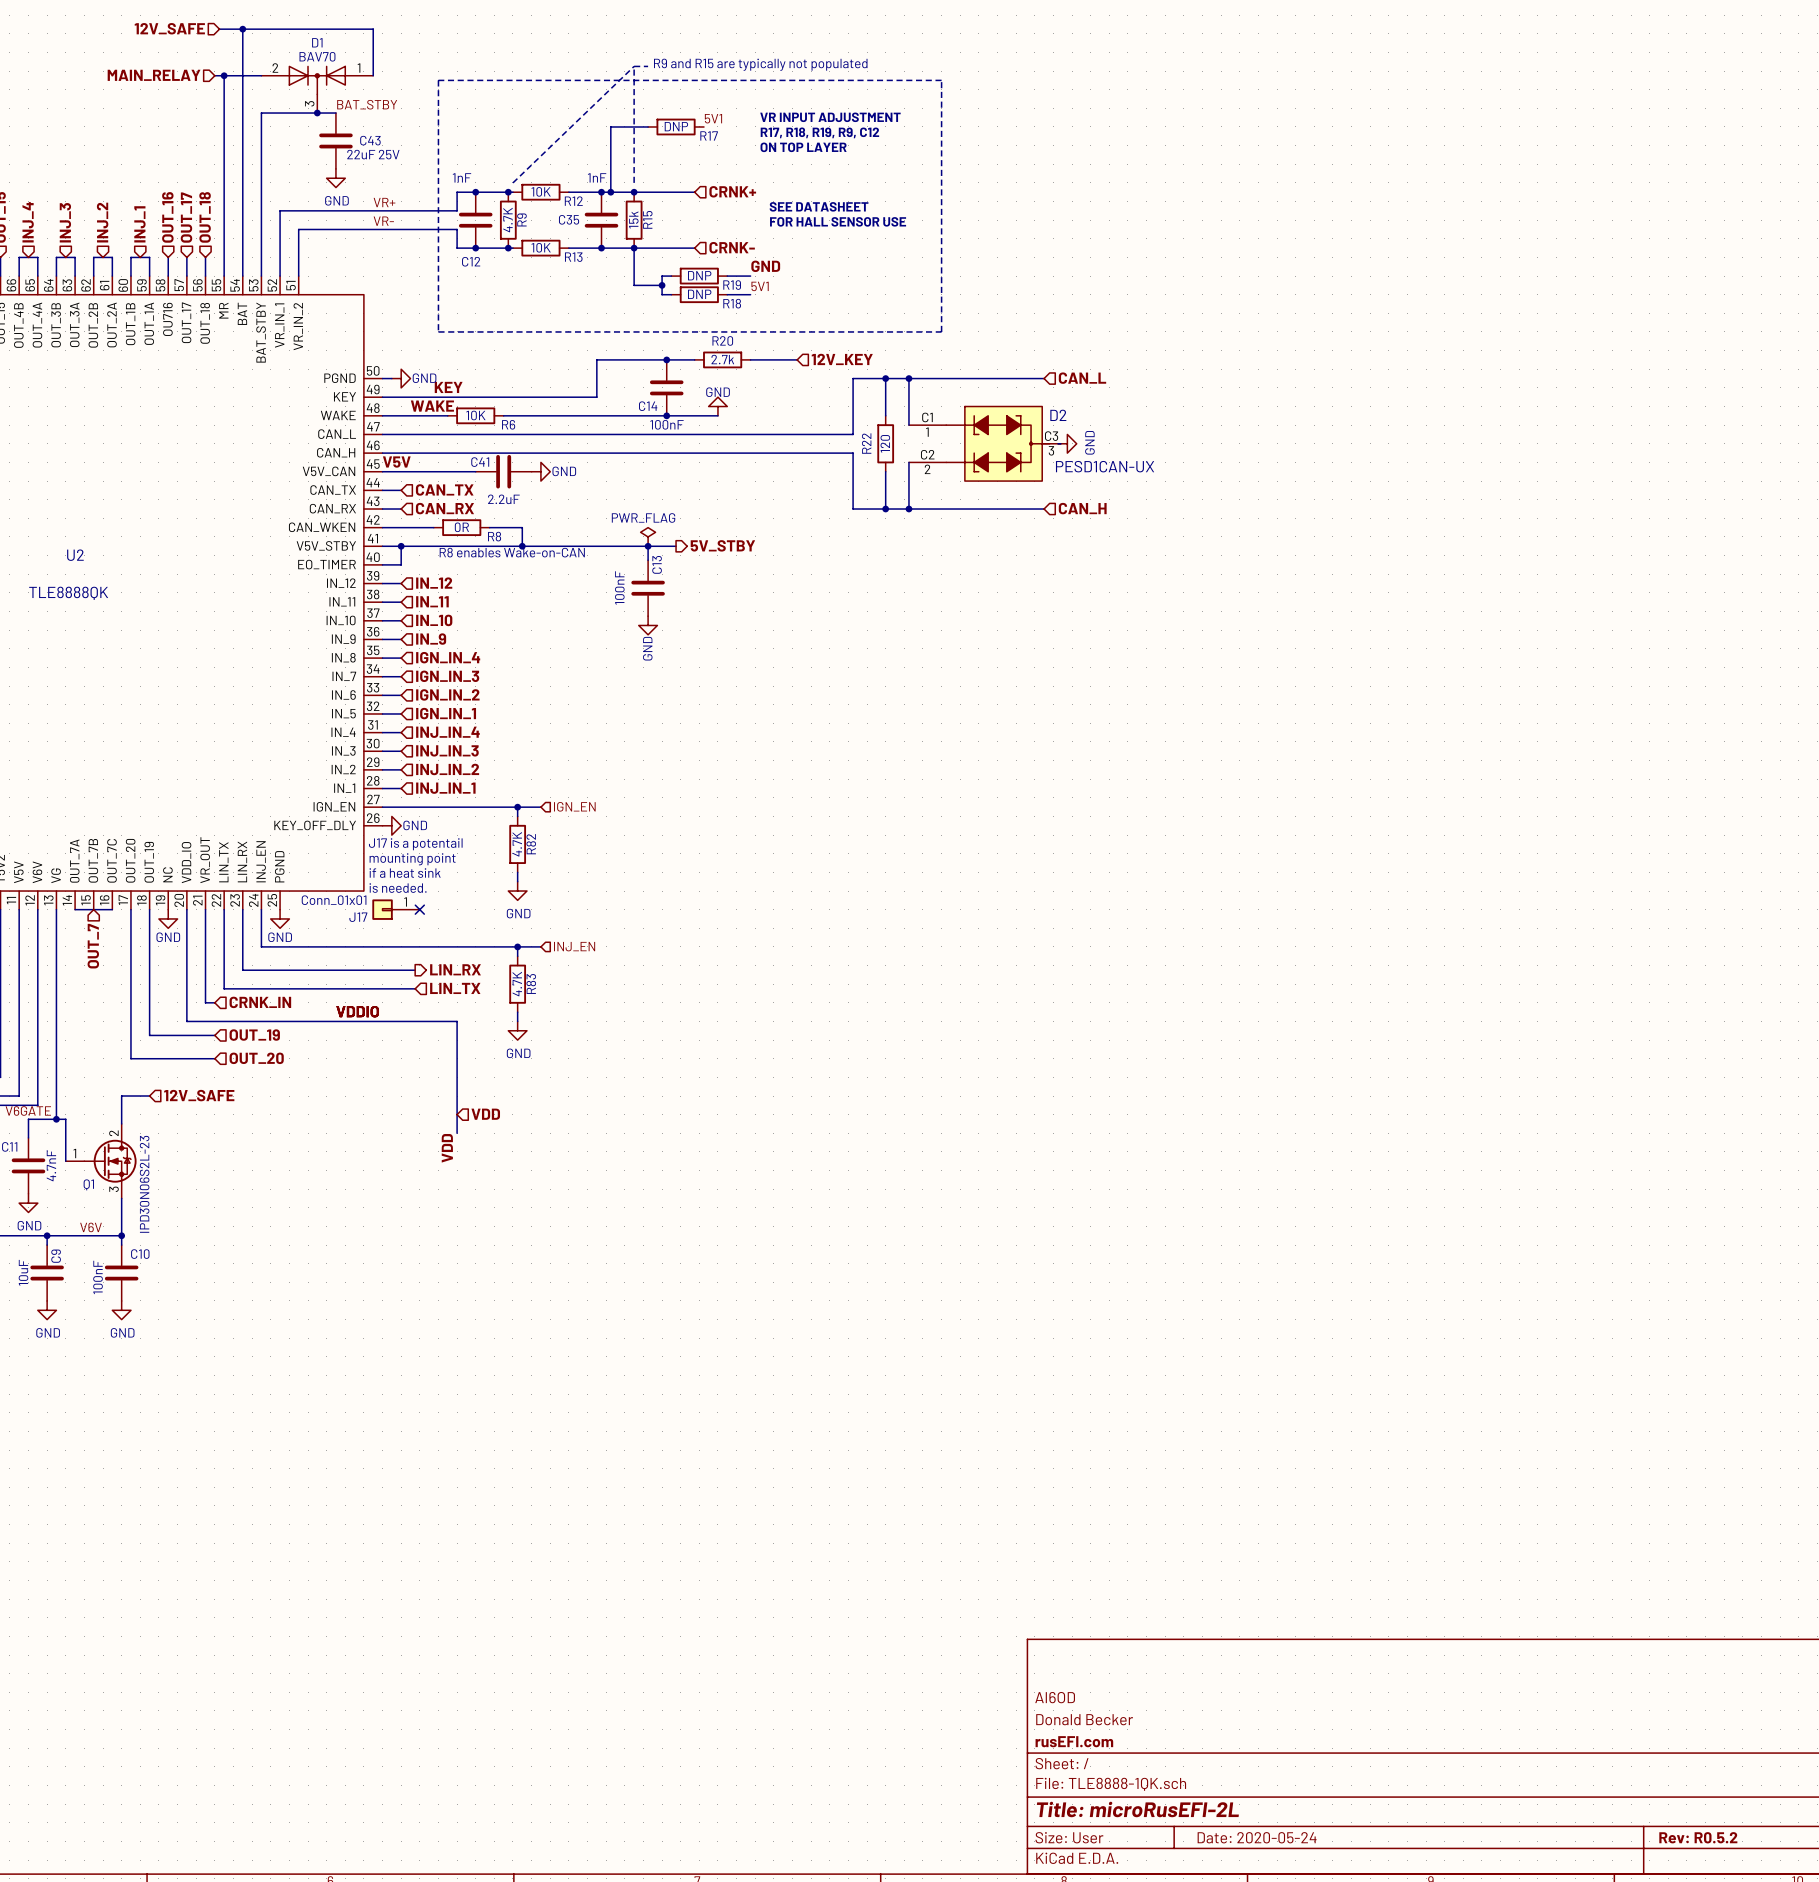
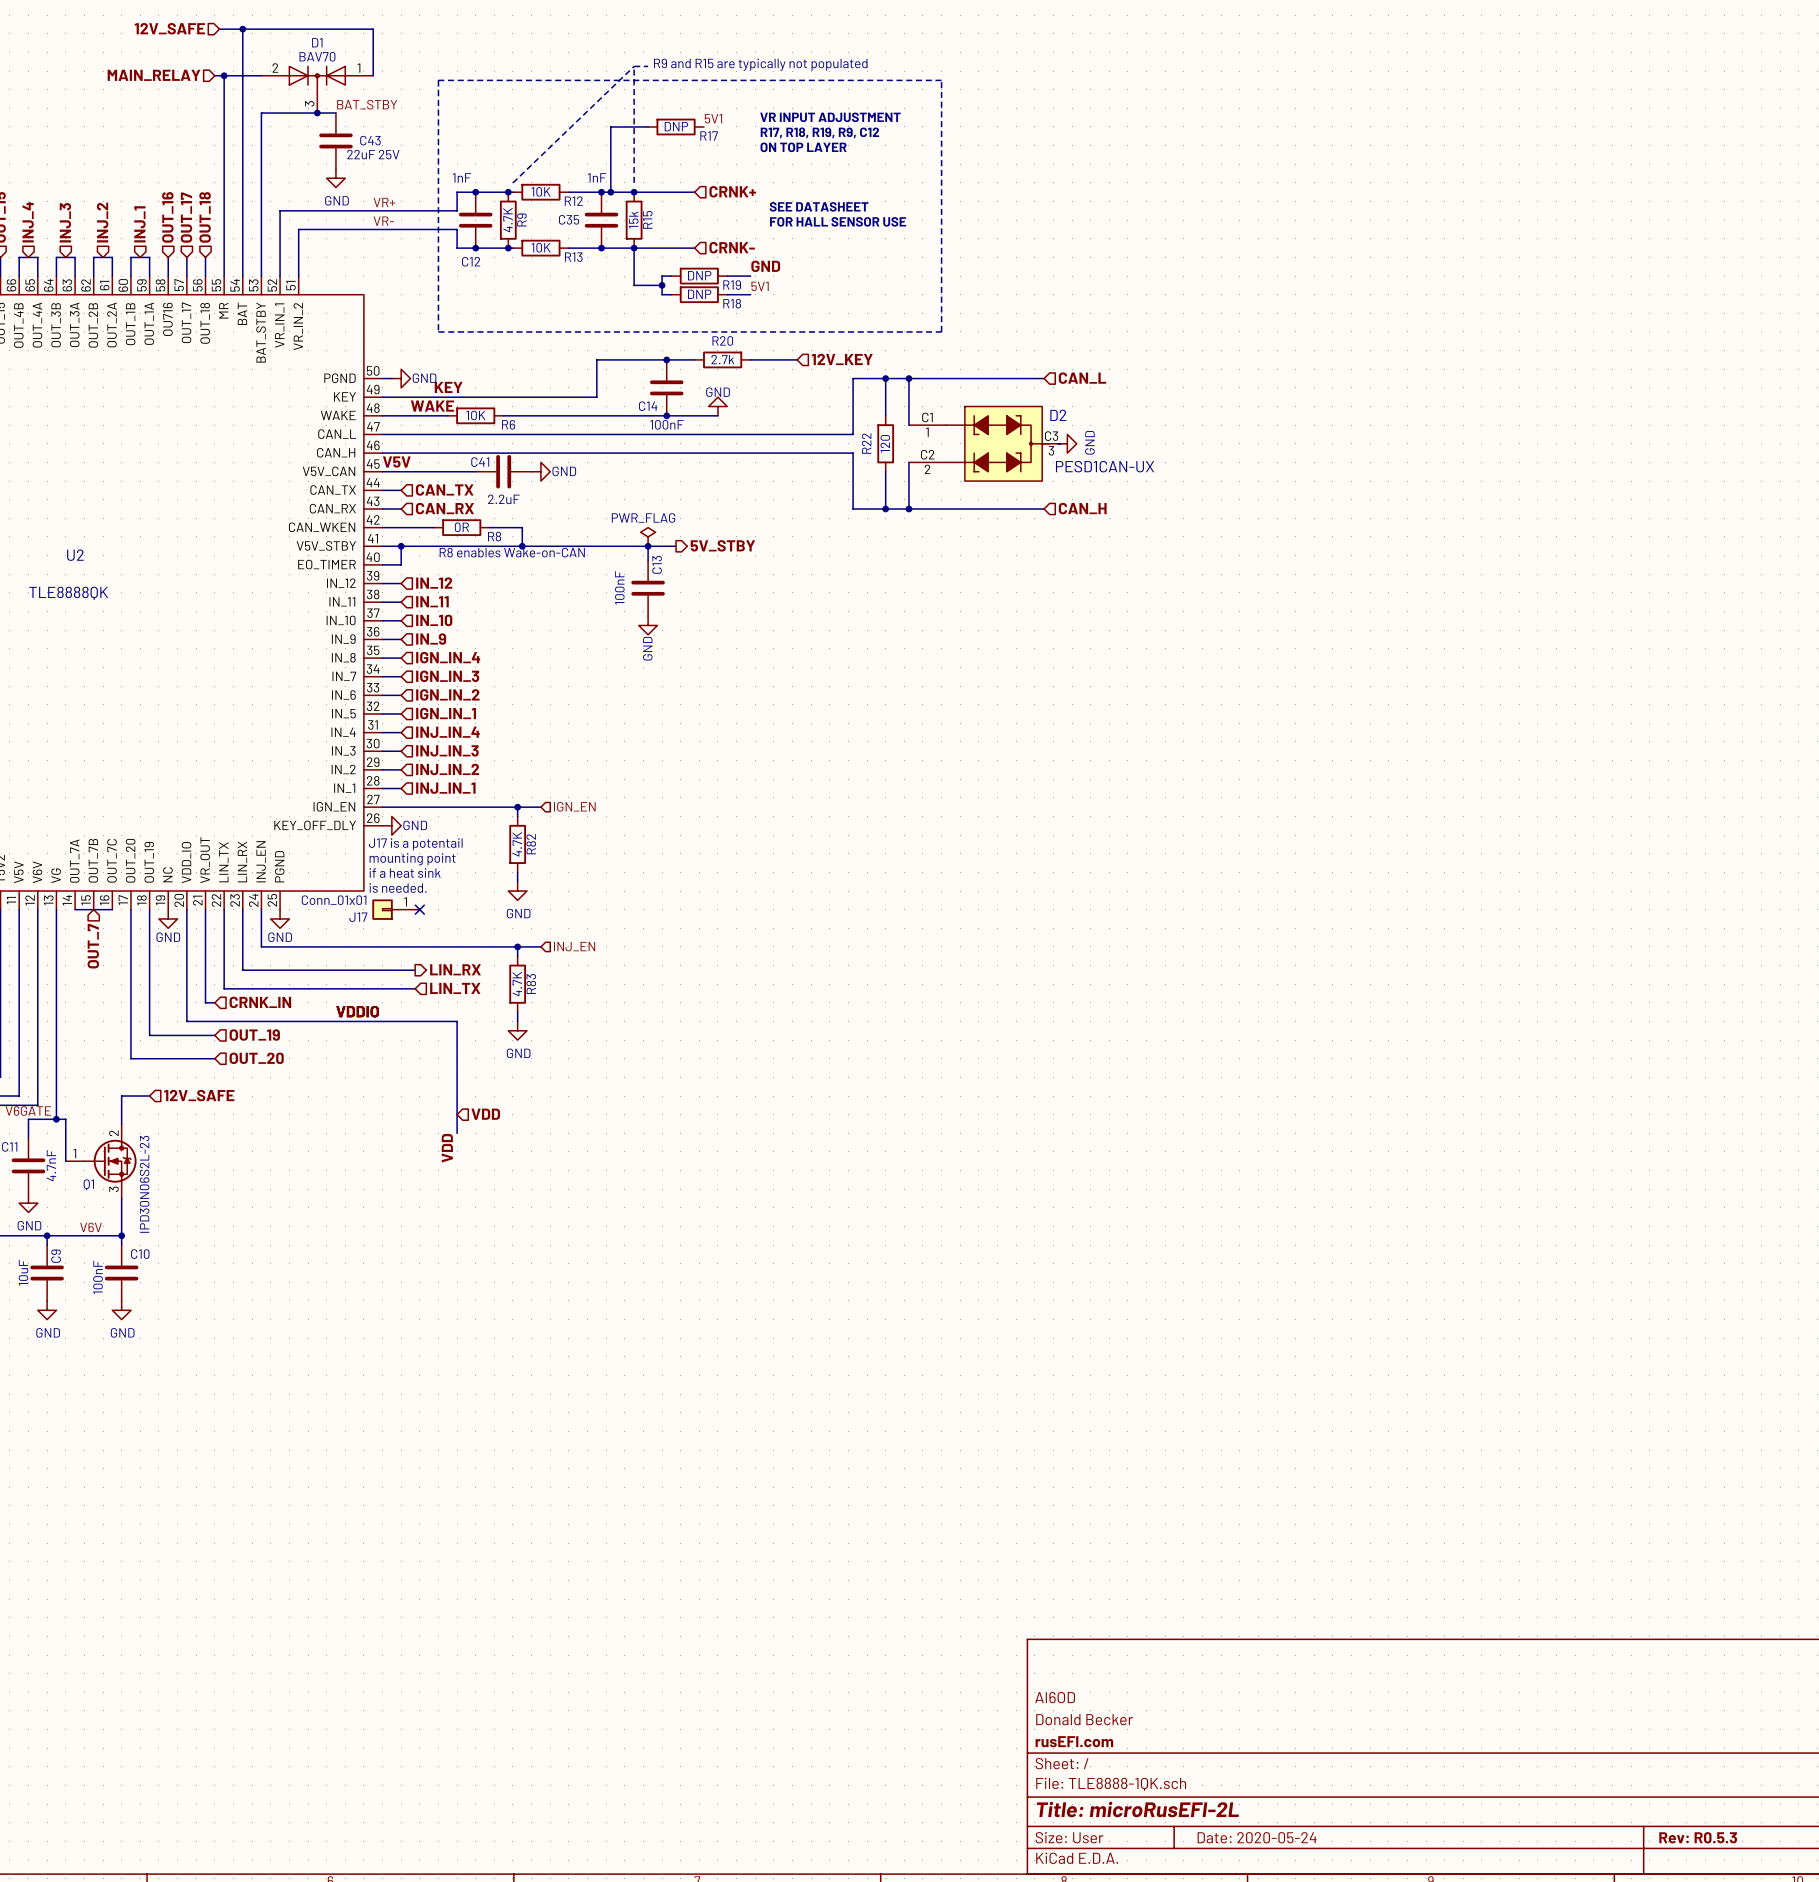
title block: Rev: R0.5.2 (1698, 1837) -> Rev: R0.5.3 (1698, 1837)

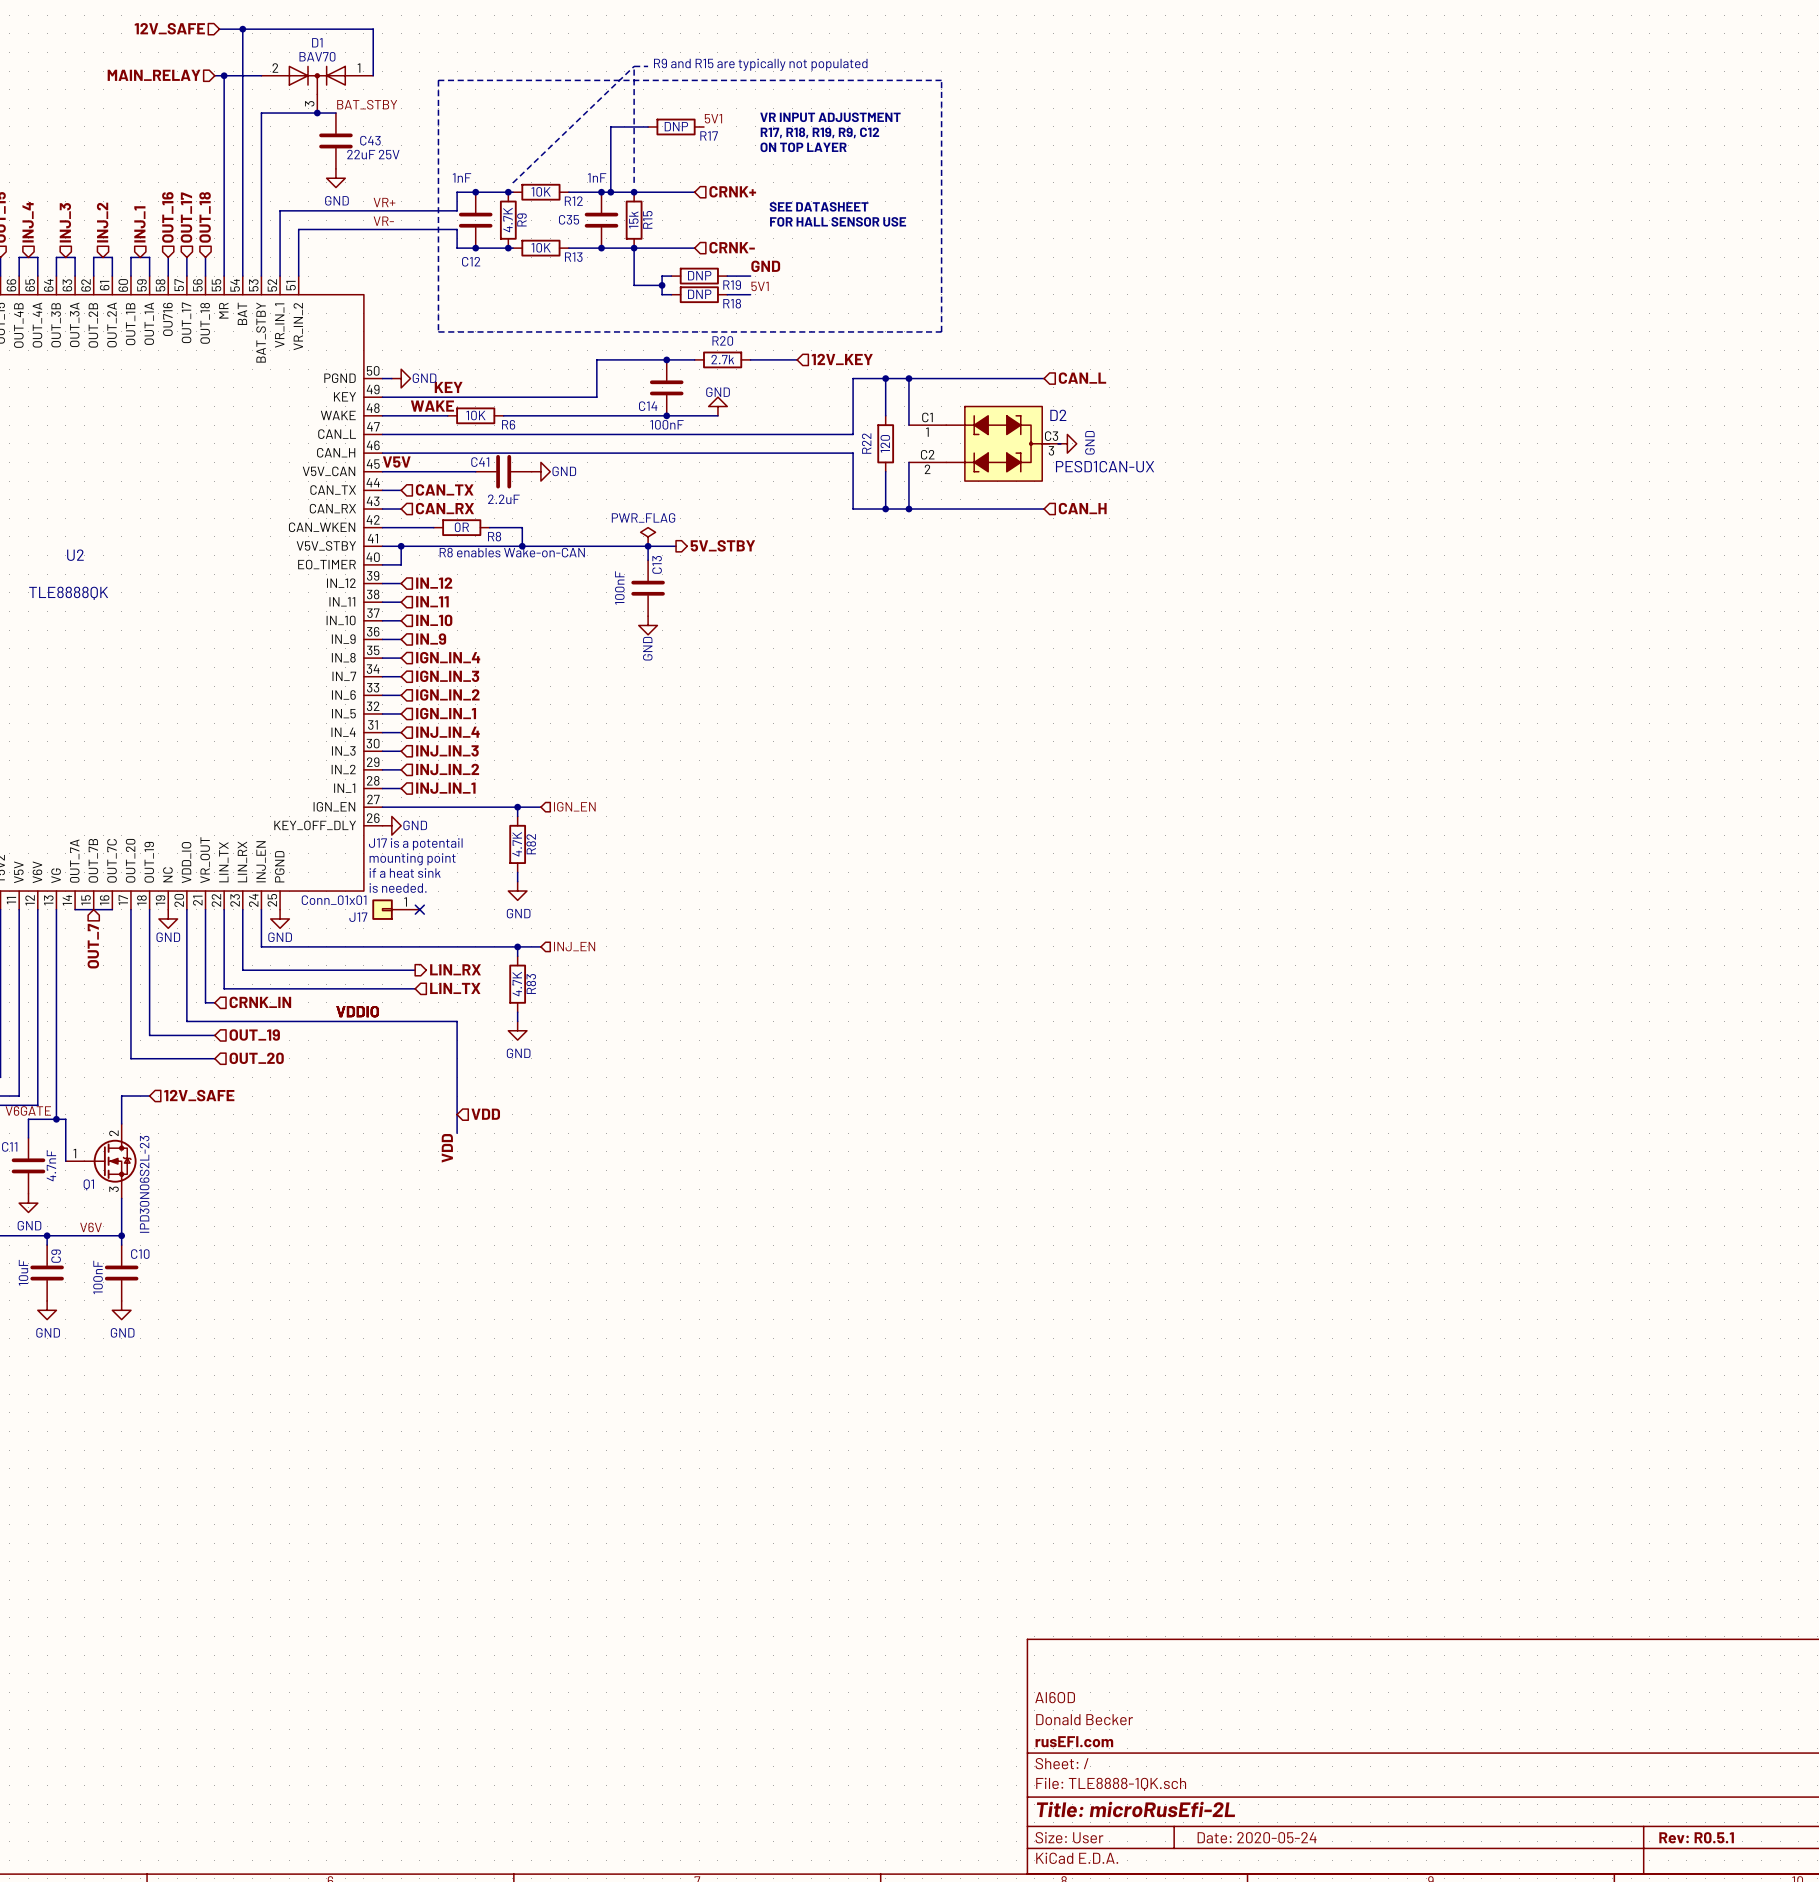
title block: Title: microRusEFI-2L (1137, 1809) -> Title: microRusEfi-2L (1135, 1809)
title block: Rev: R0.5.3 (1698, 1837) -> Rev: R0.5.1 (1696, 1837)

